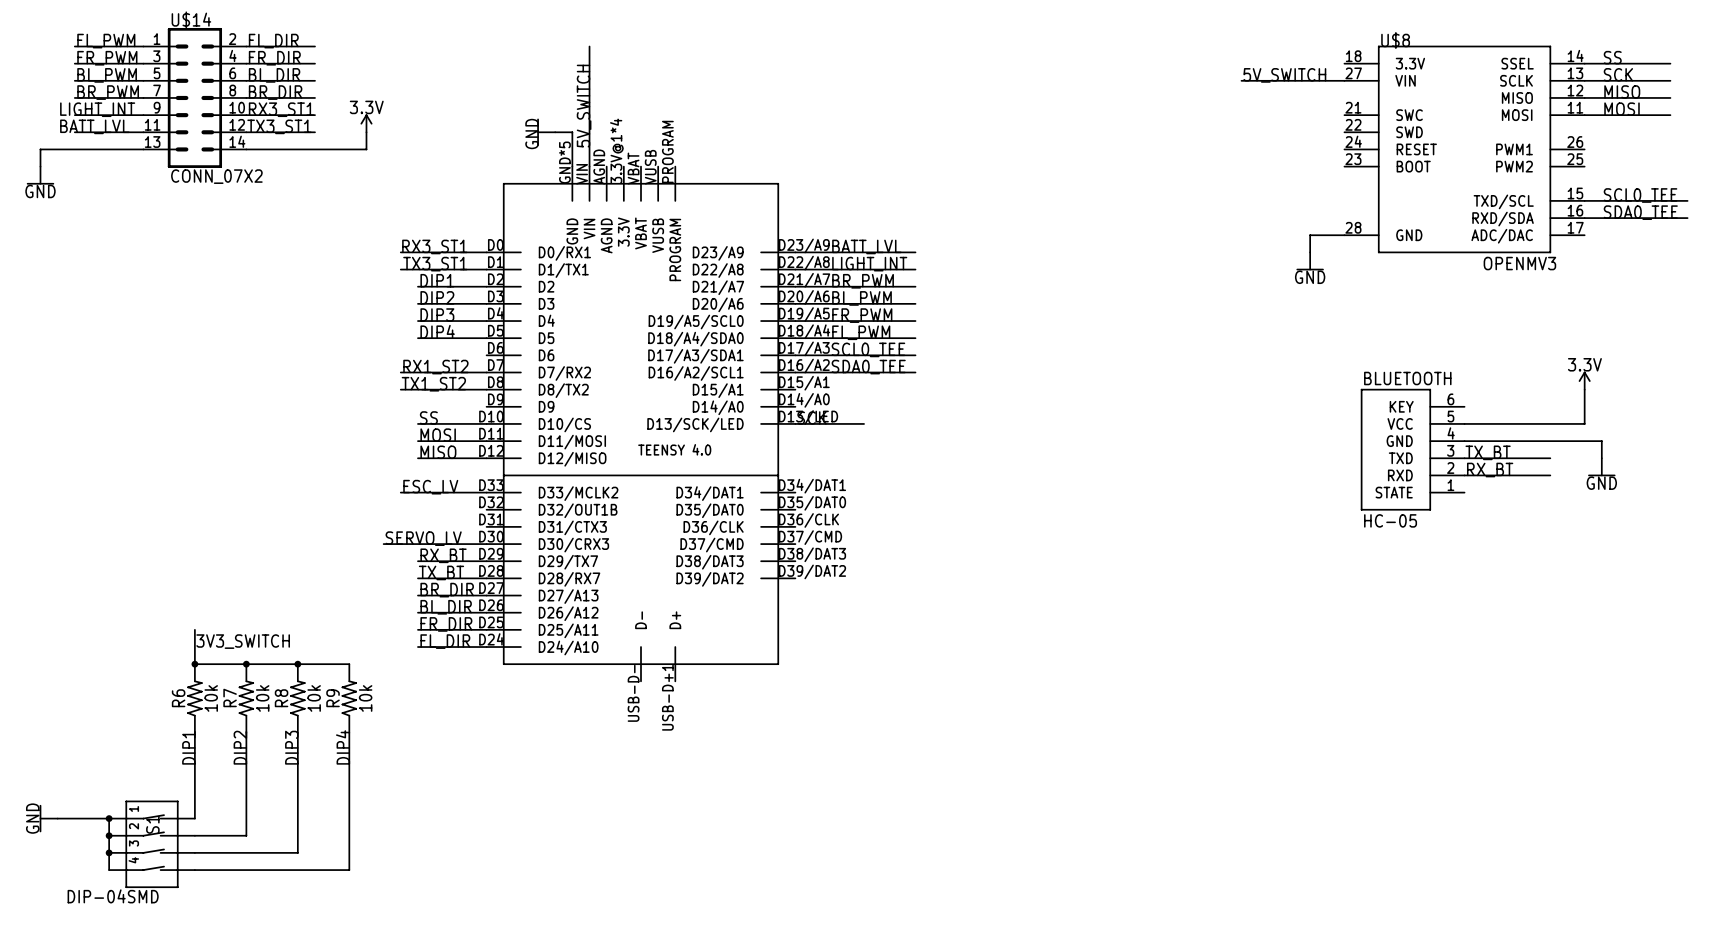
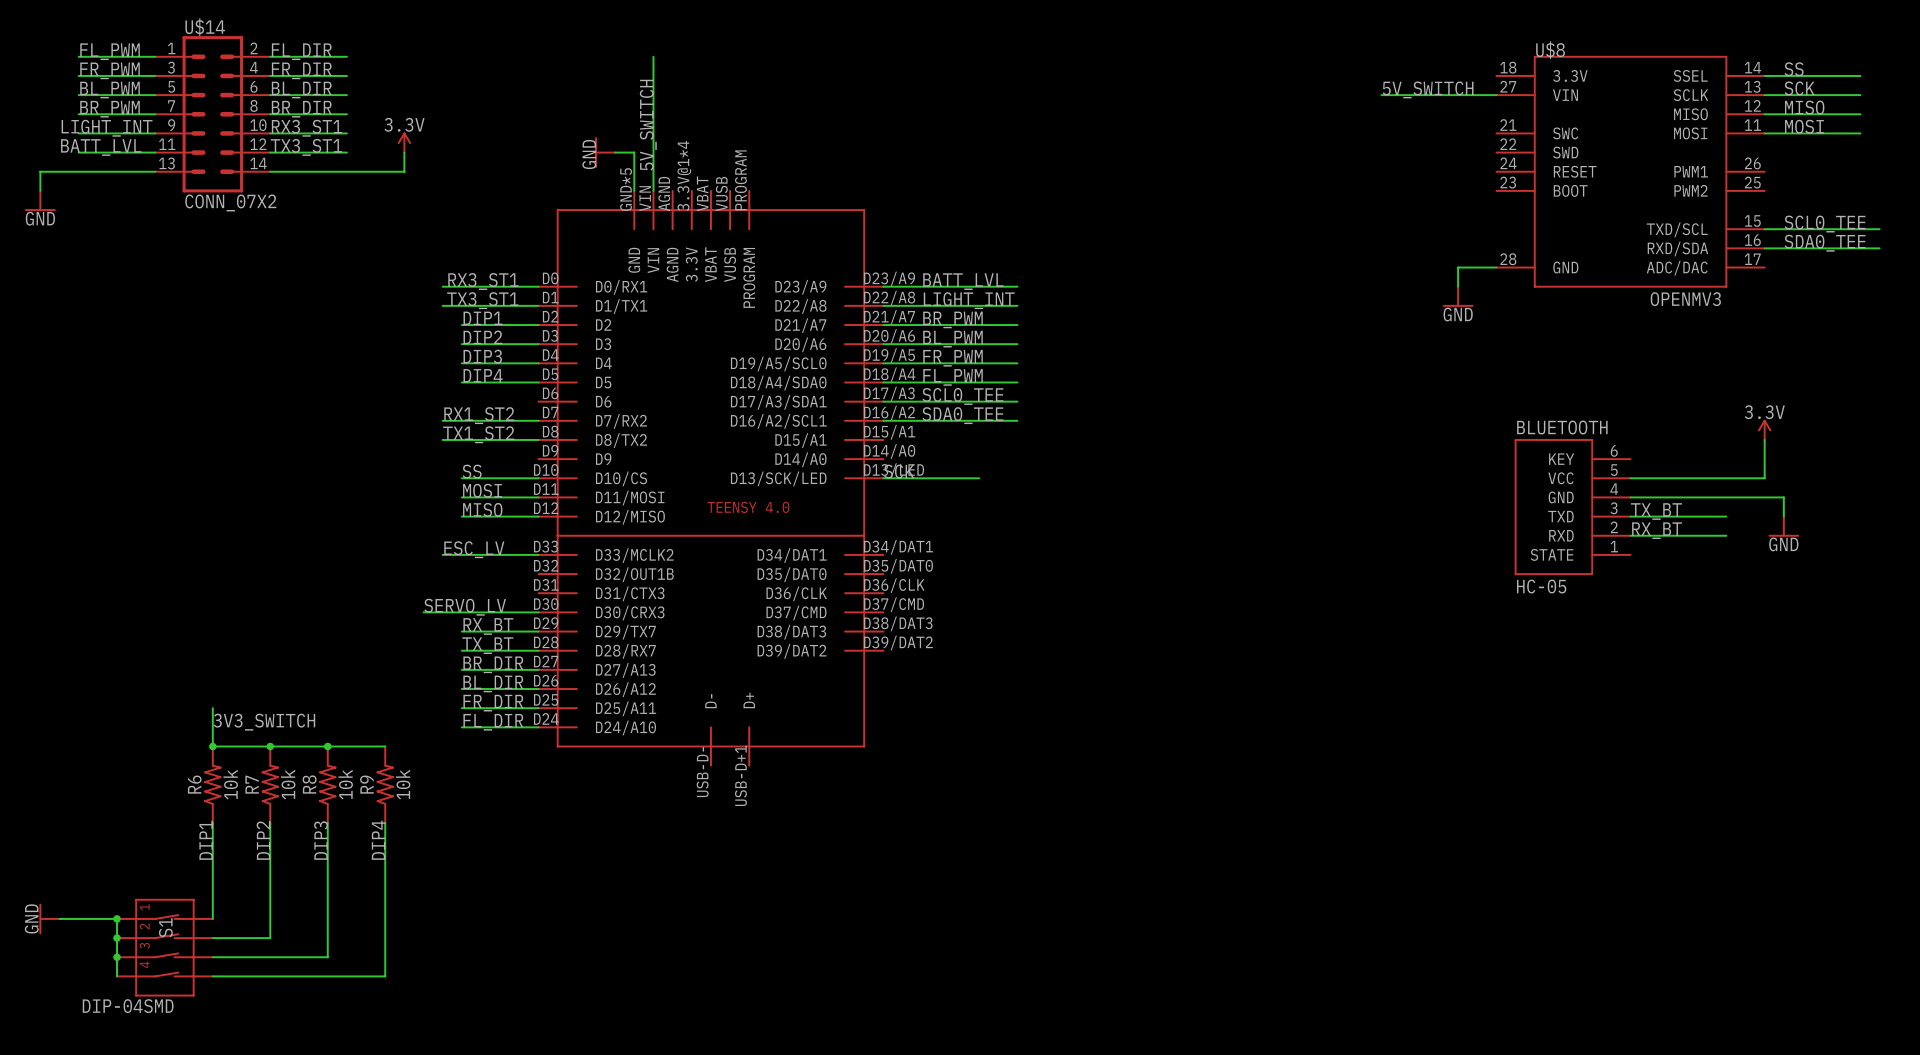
wire: none -> (960, 478) (979, 478)

